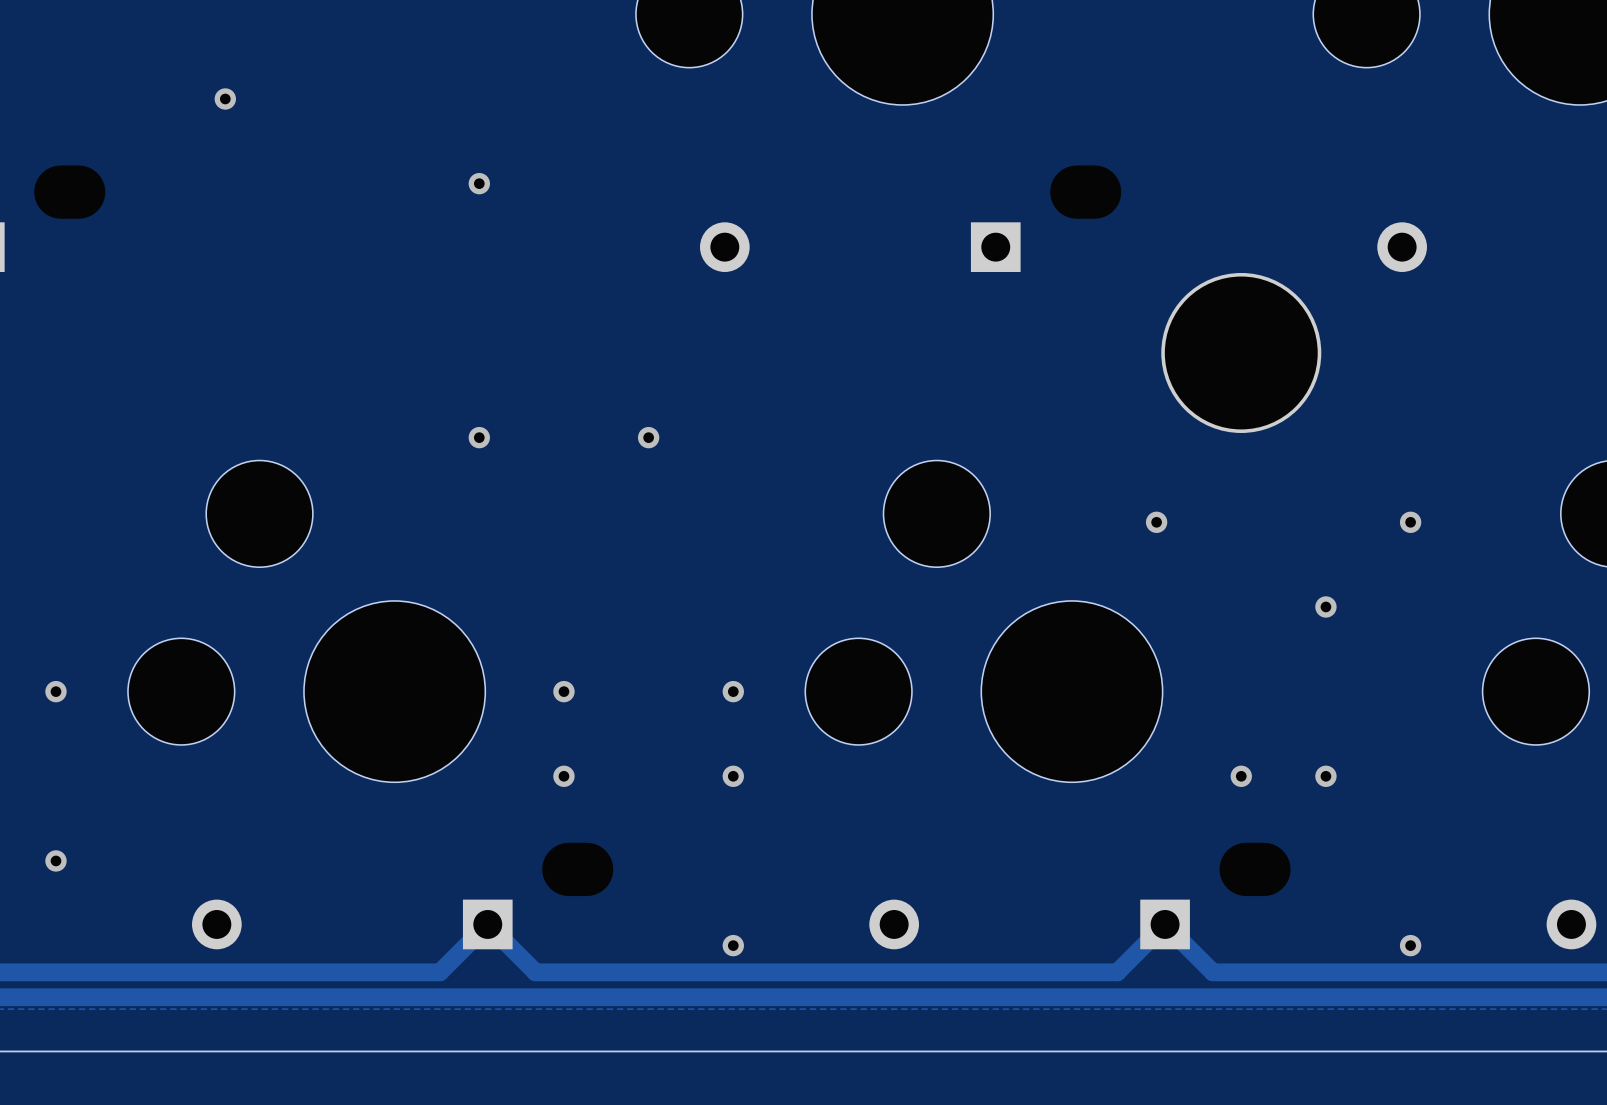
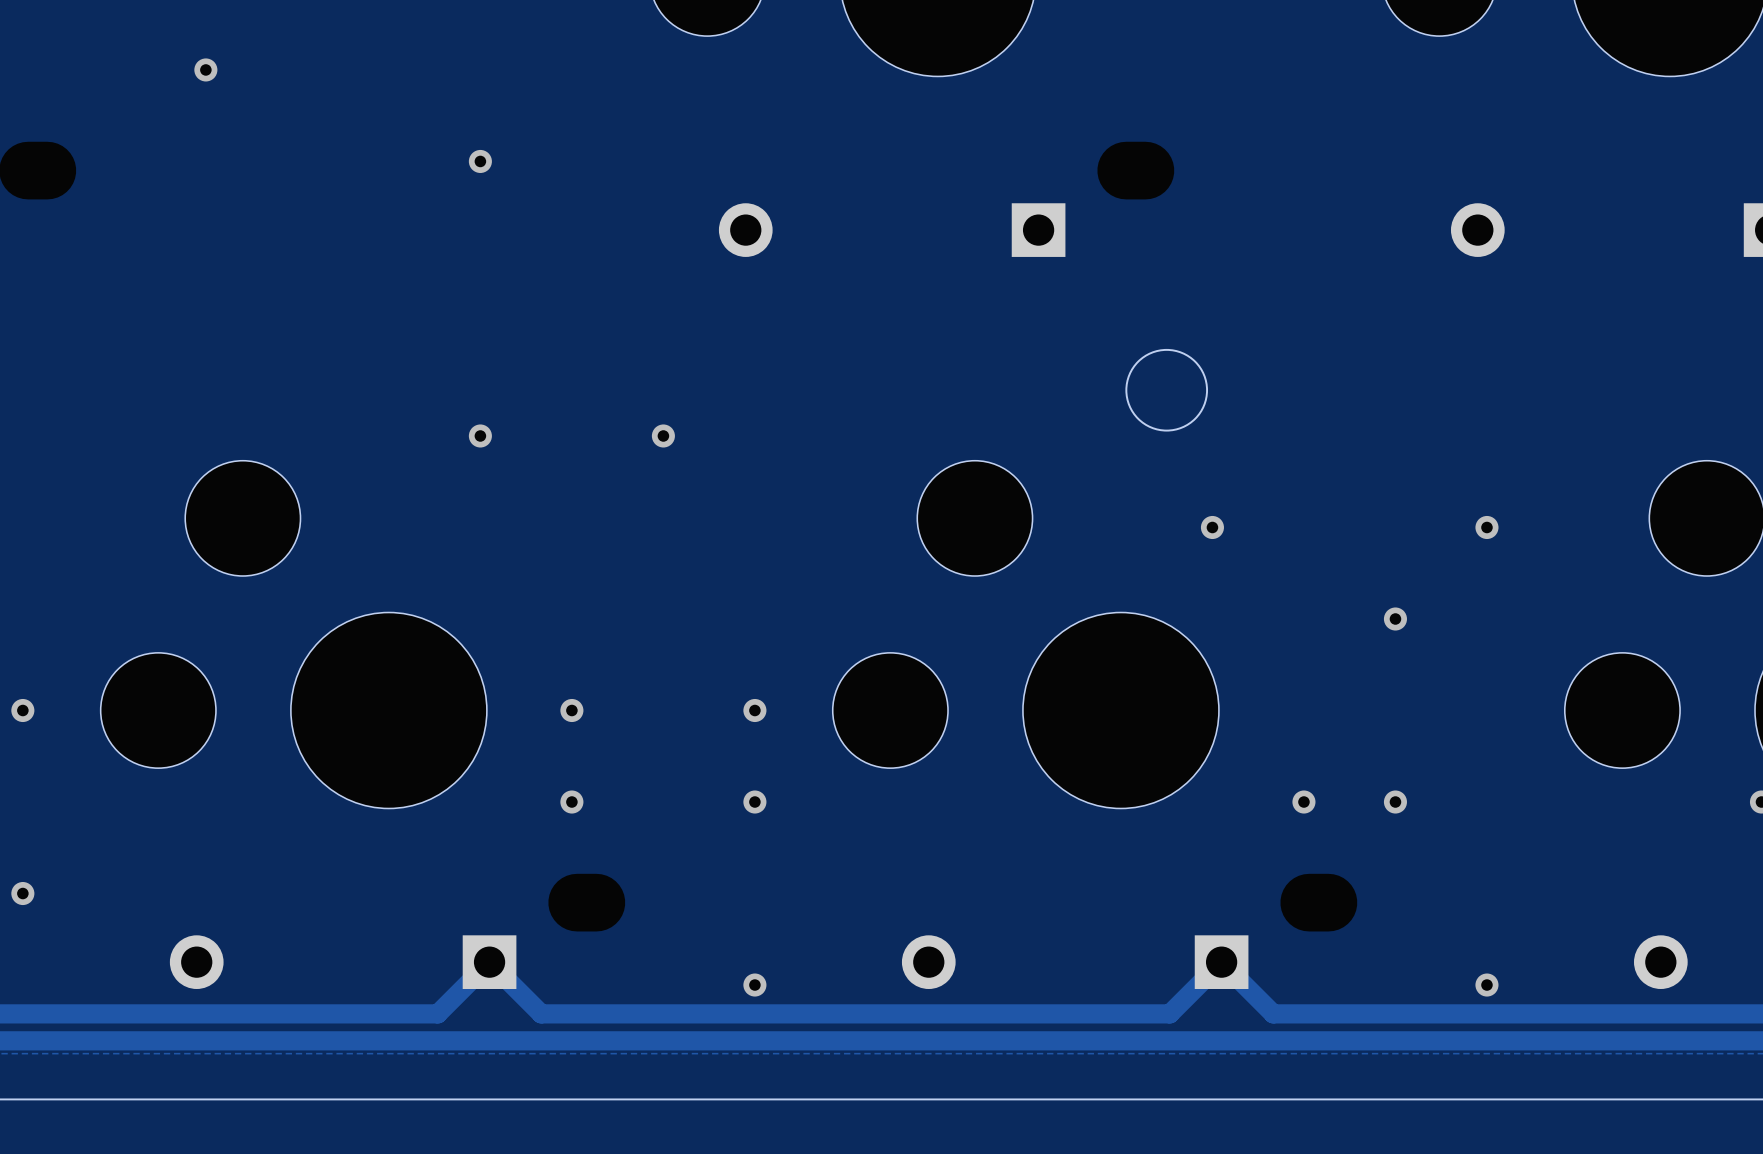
part: (1241, 352) -> none
round board edge: none -> [1125, 348, 1209, 432]

